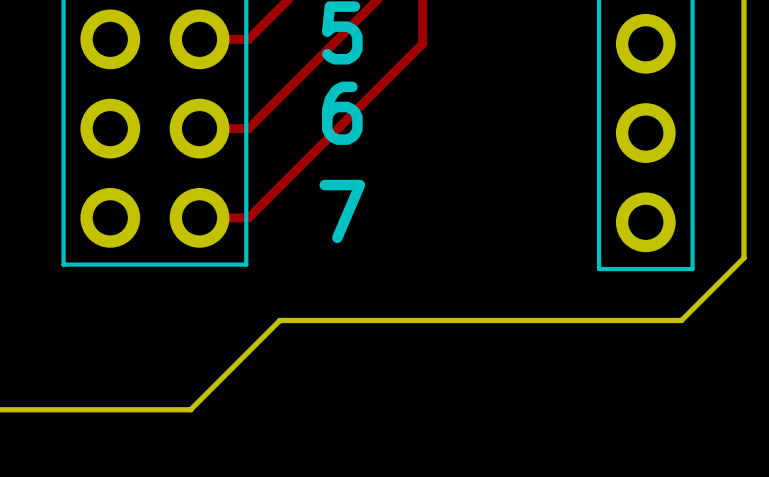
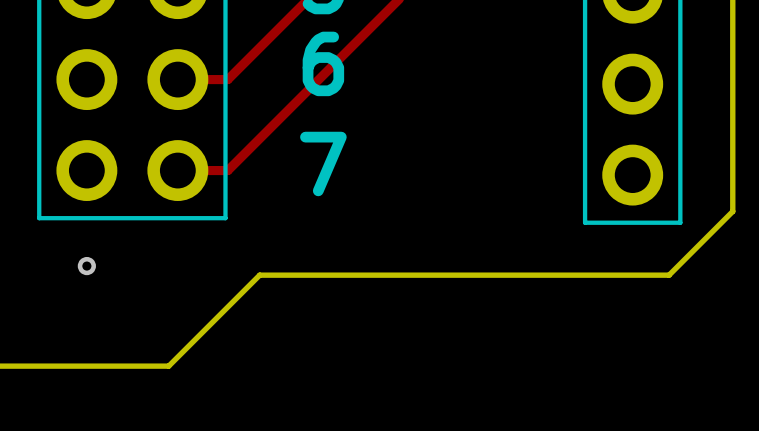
via: none -> (86, 266)

